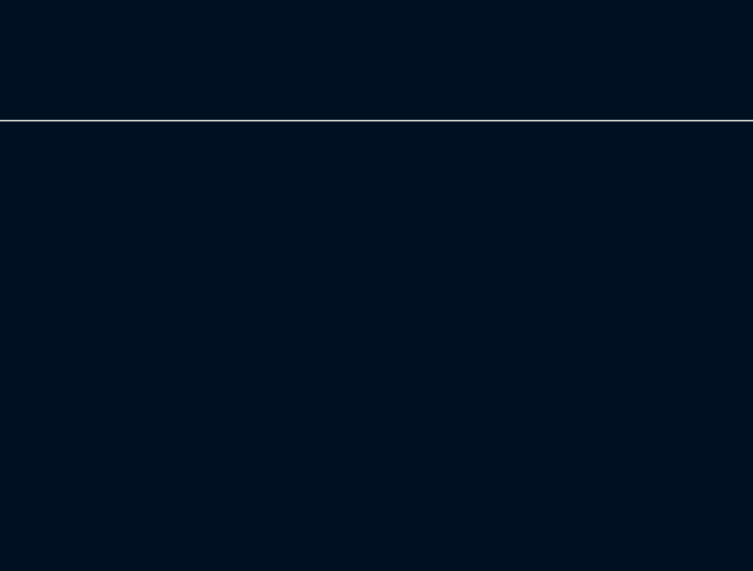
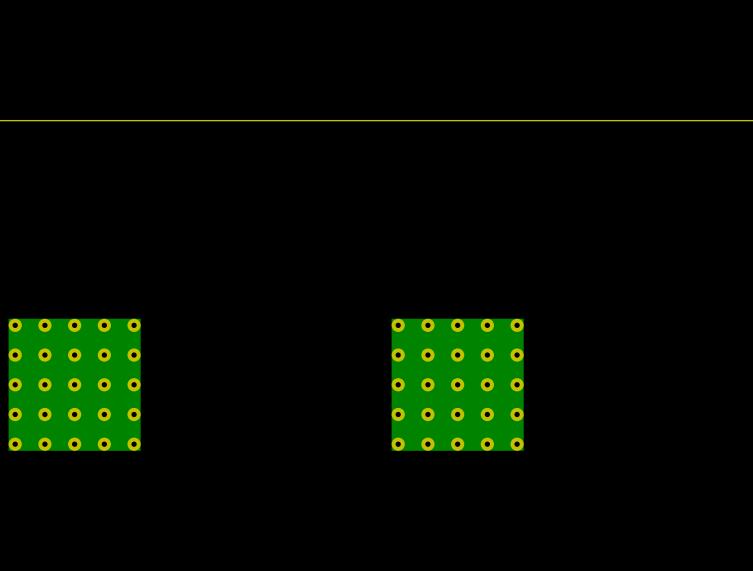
part: none -> (74, 384)
part: none -> (457, 384)

